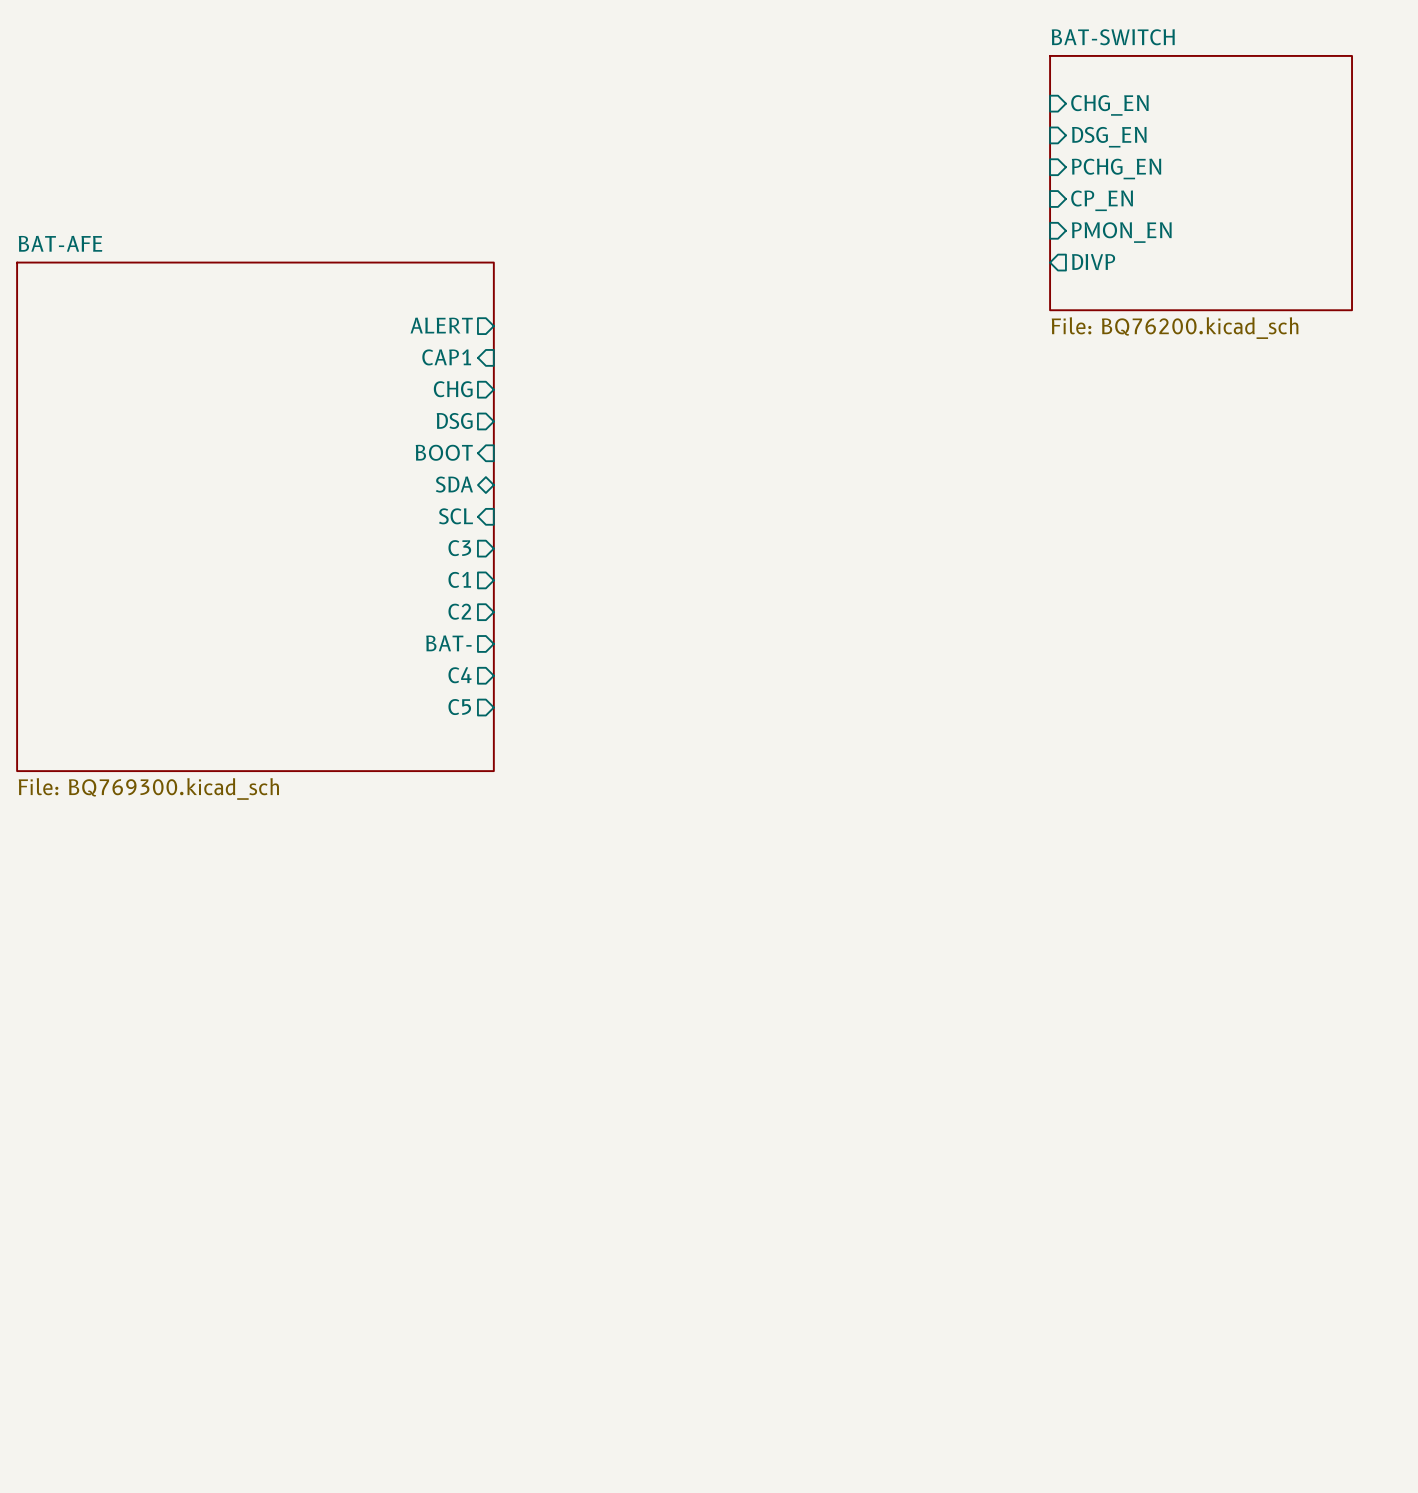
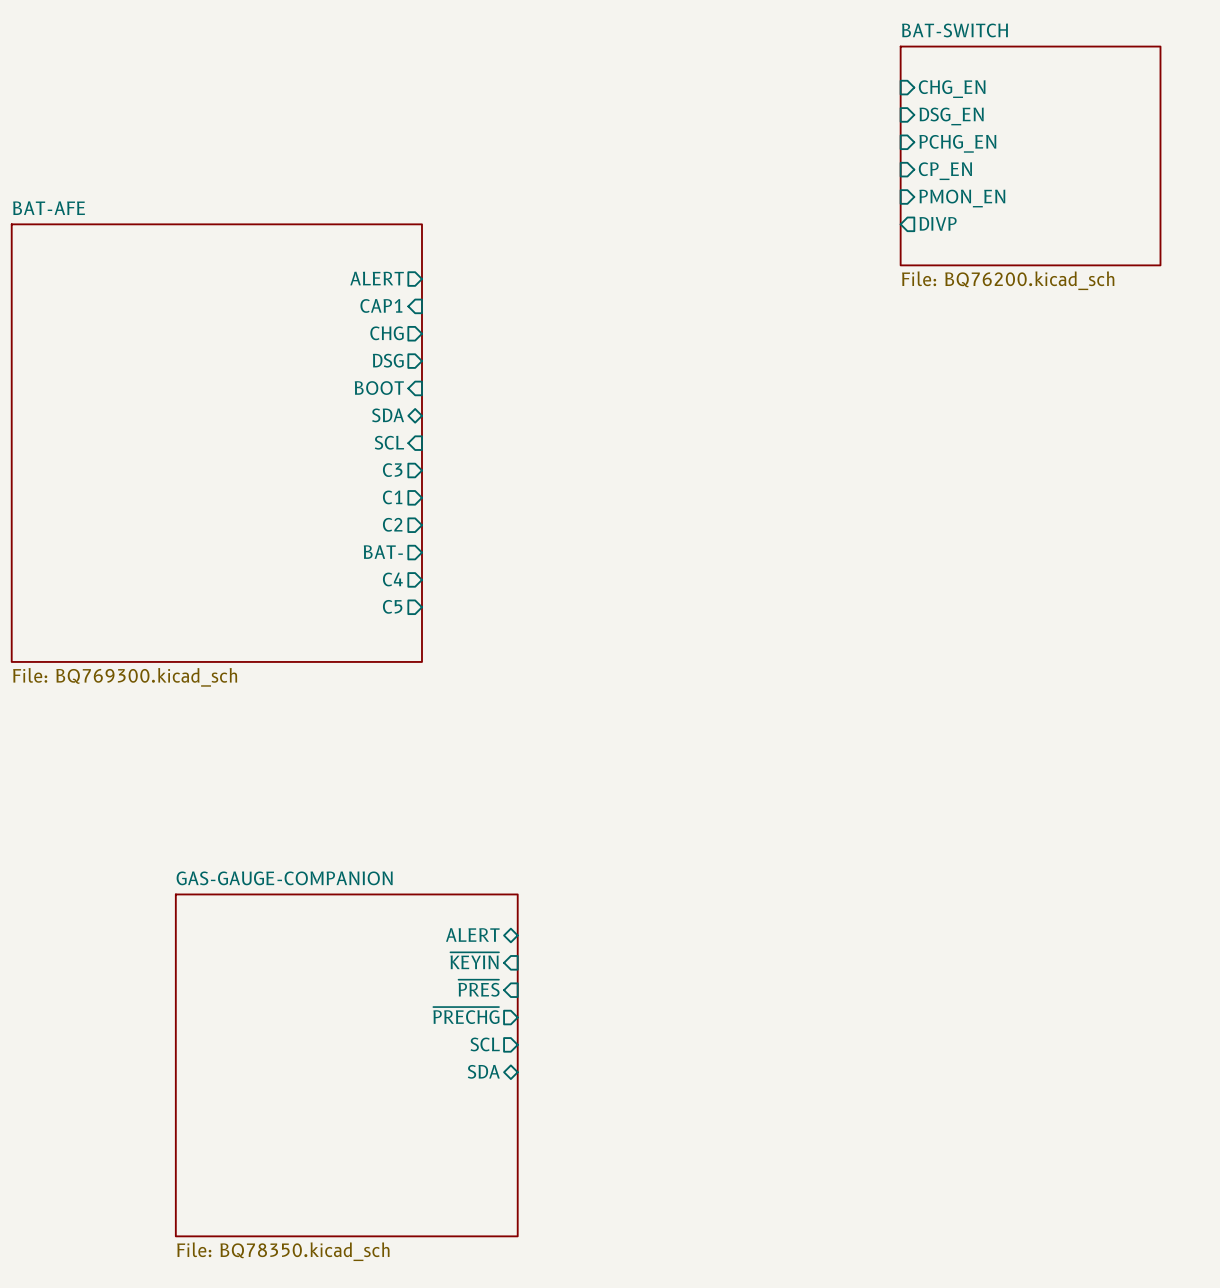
sheet pin: none -> ALERT (472, 934)
sheet pin: none -> ~{KEYIN} (474, 960)
sheet pin: none -> ~{PRES} (479, 988)
sheet pin: none -> ~{PRECHG} (466, 1015)
sheet pin: none -> SCL (485, 1044)
sheet GAS-GAUGE-COMPANION: none -> File: BQ78350.kicad_sch (346, 1065)
sheet pin: none -> SDA (483, 1071)

